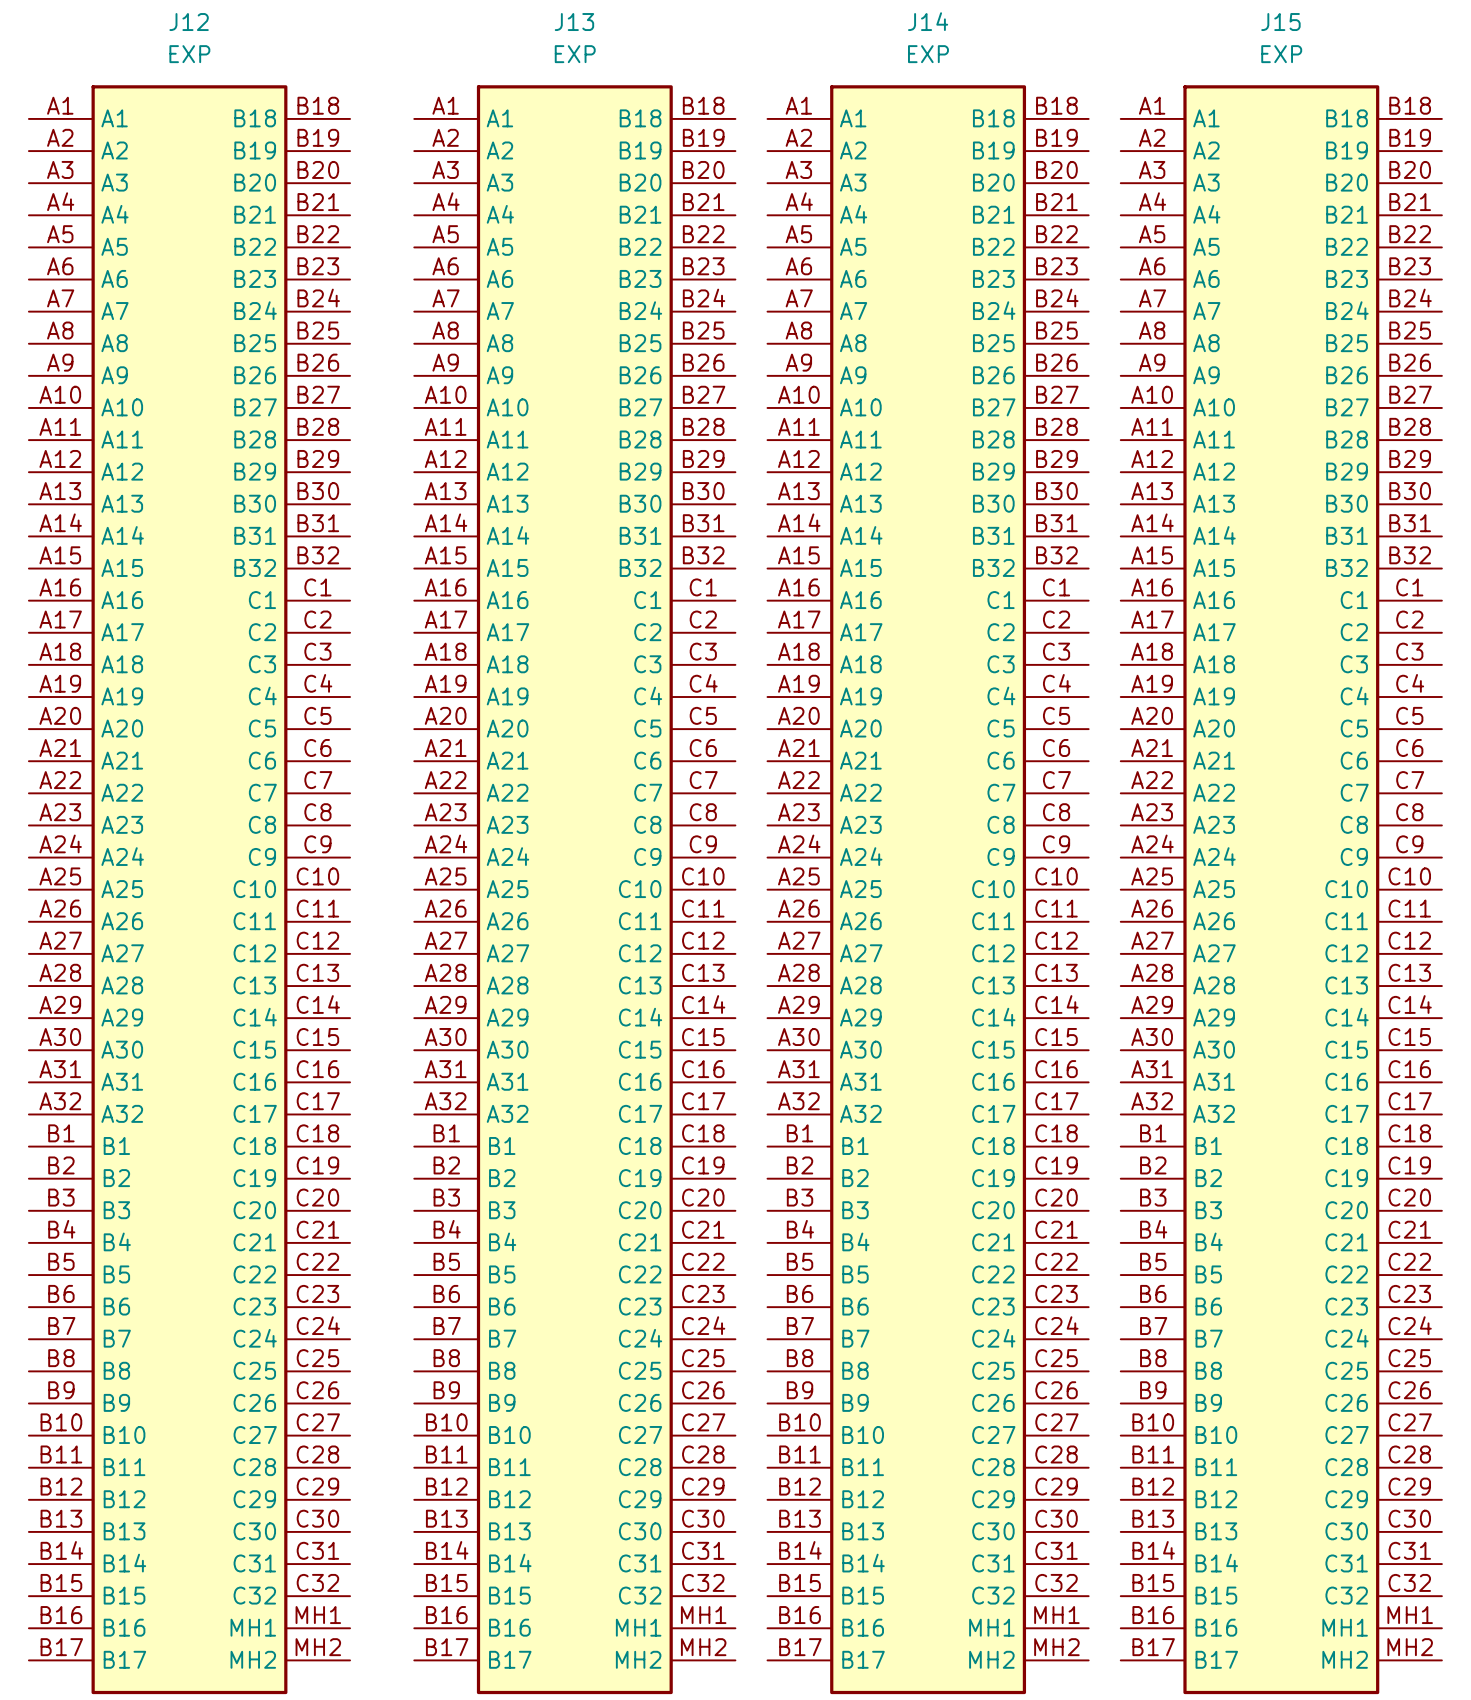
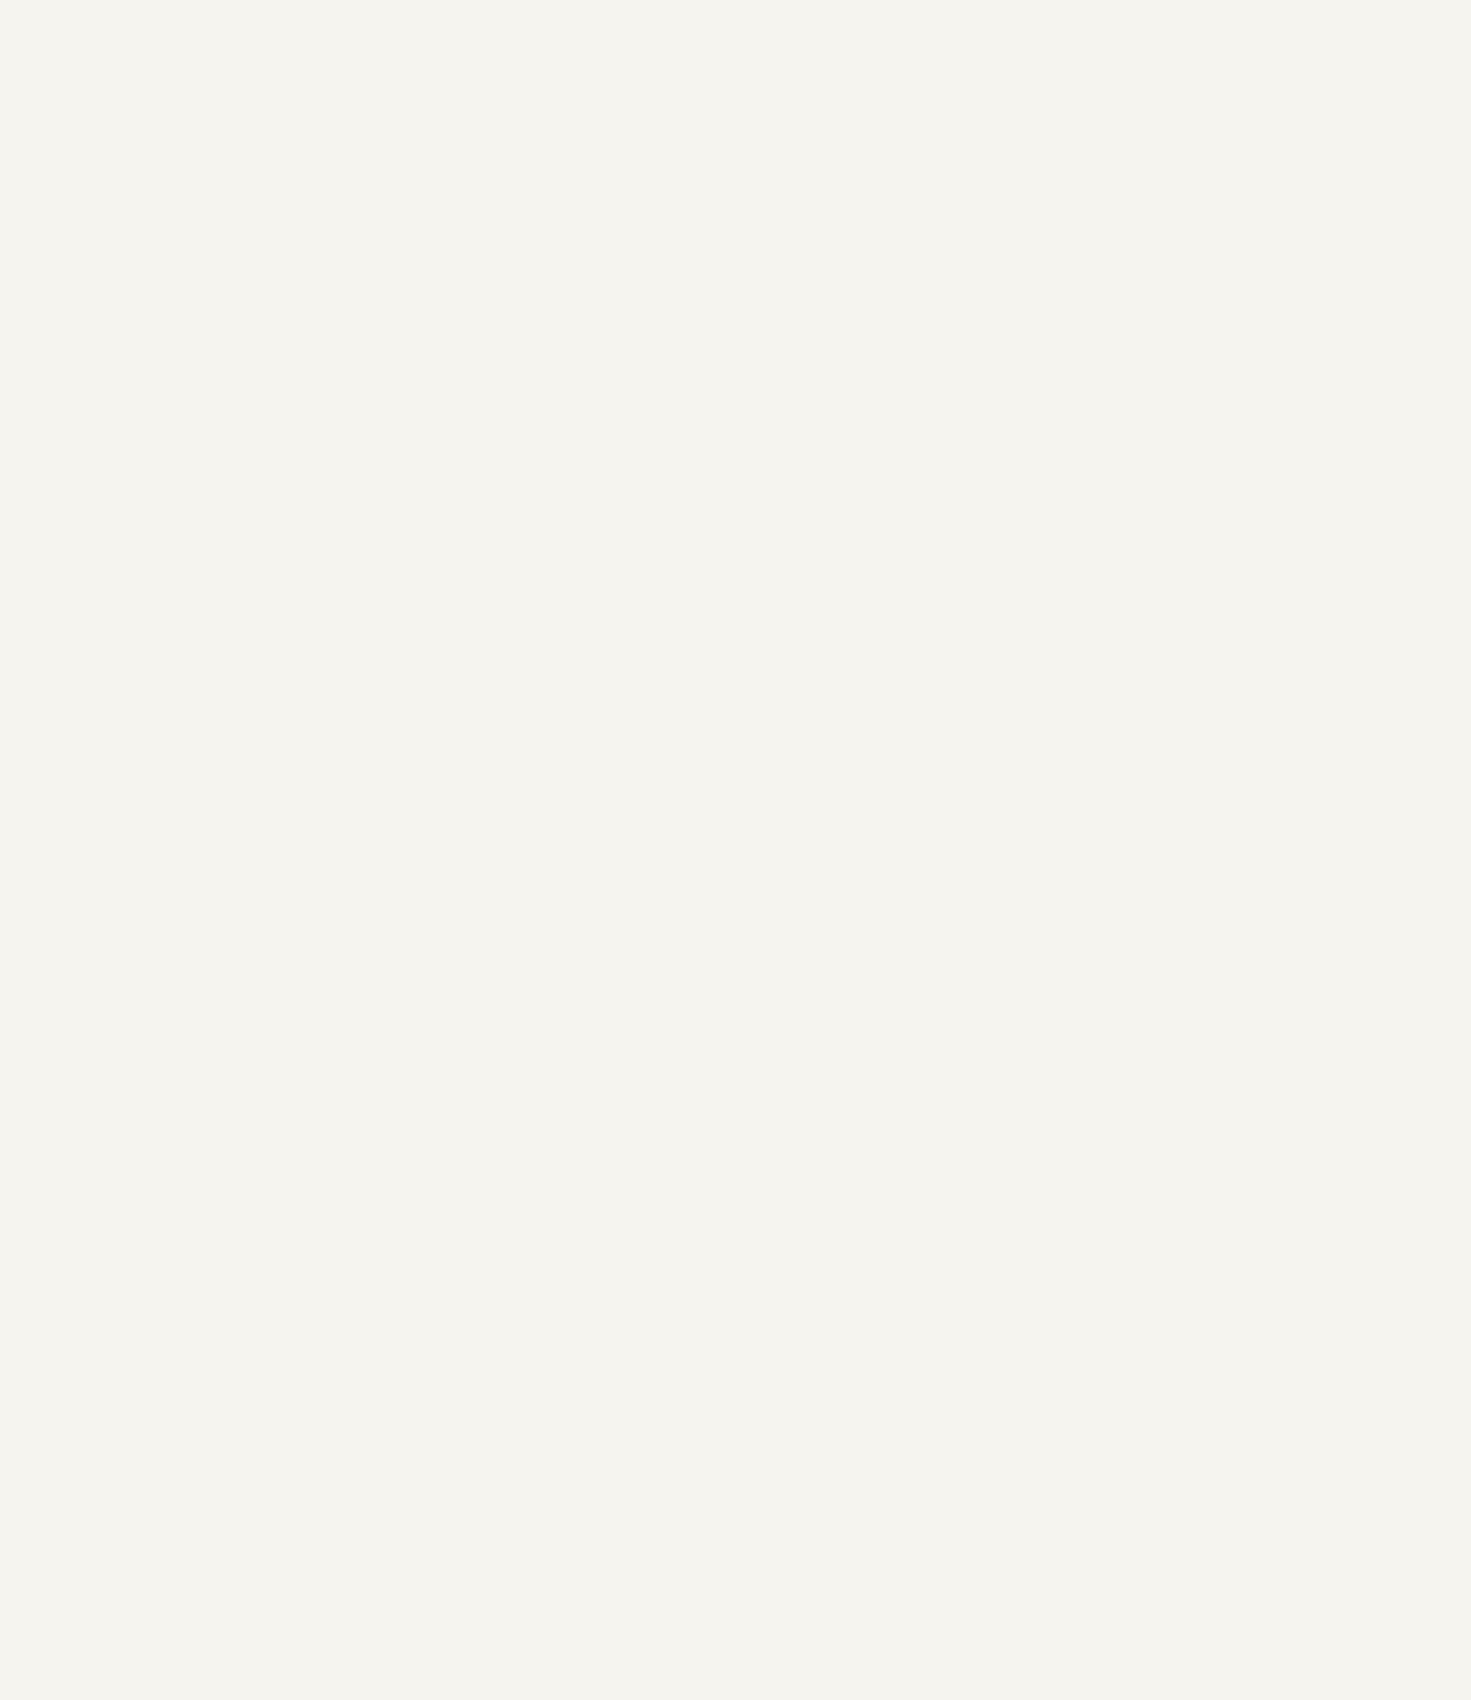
J12: EXP (189, 889) -> none
J13: EXP (574, 889) -> none
J14: EXP (928, 889) -> none
J15: EXP (1281, 889) -> none

